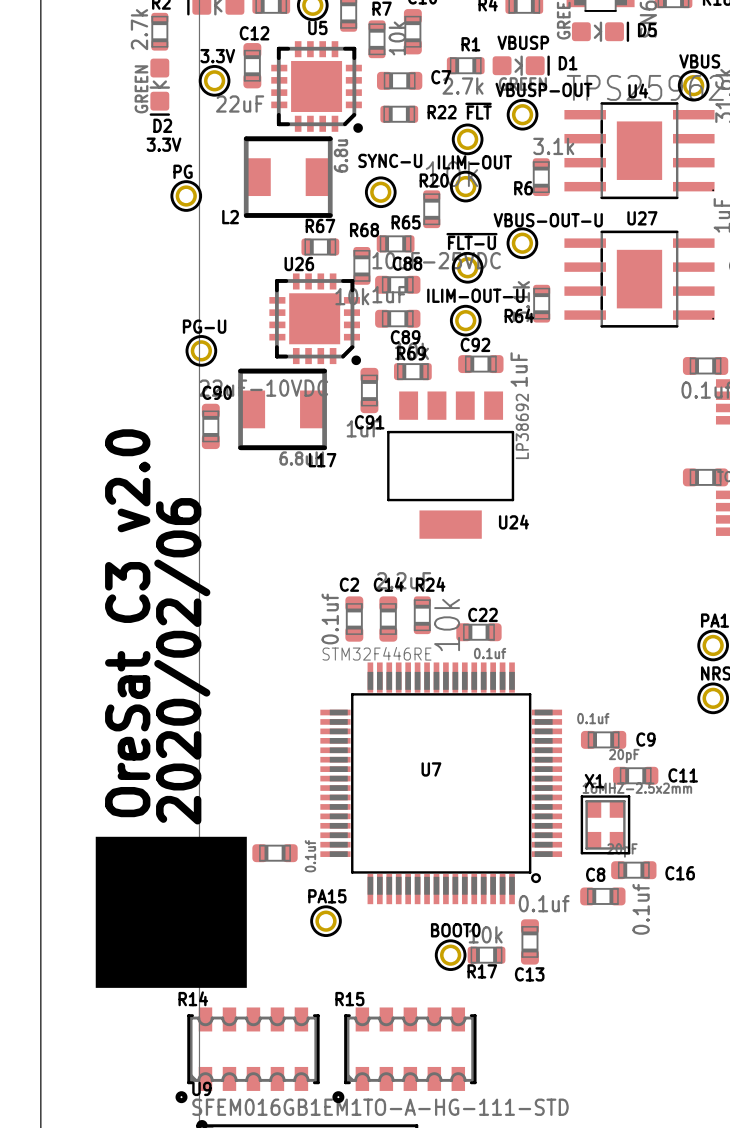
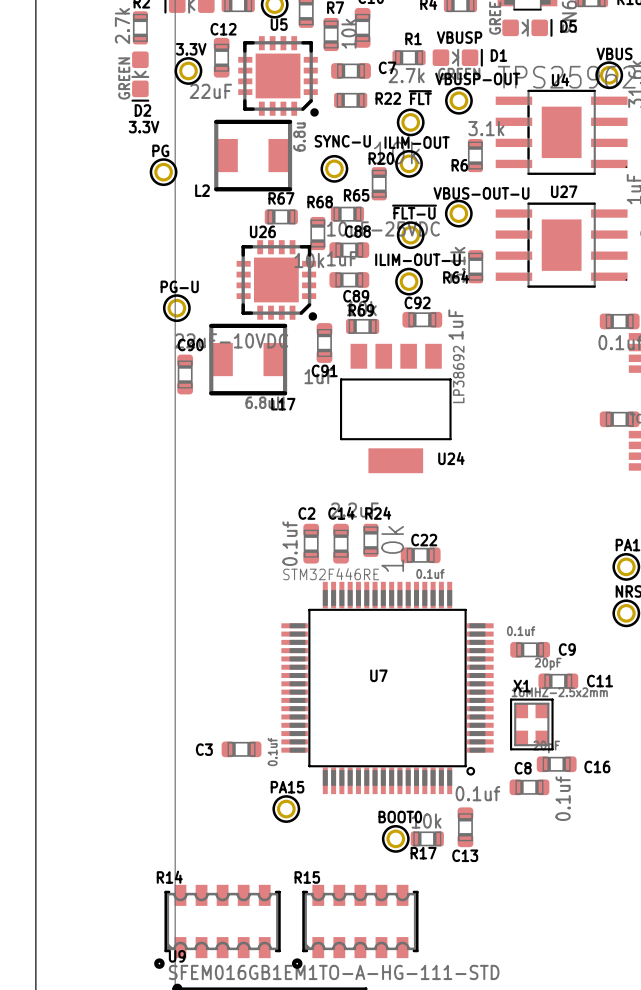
text: OreSat C3 v2.0 (127, 623) -> none
text: 2020/02/06 (182, 661) -> none
drawing: [95, 836, 247, 988] -> none

